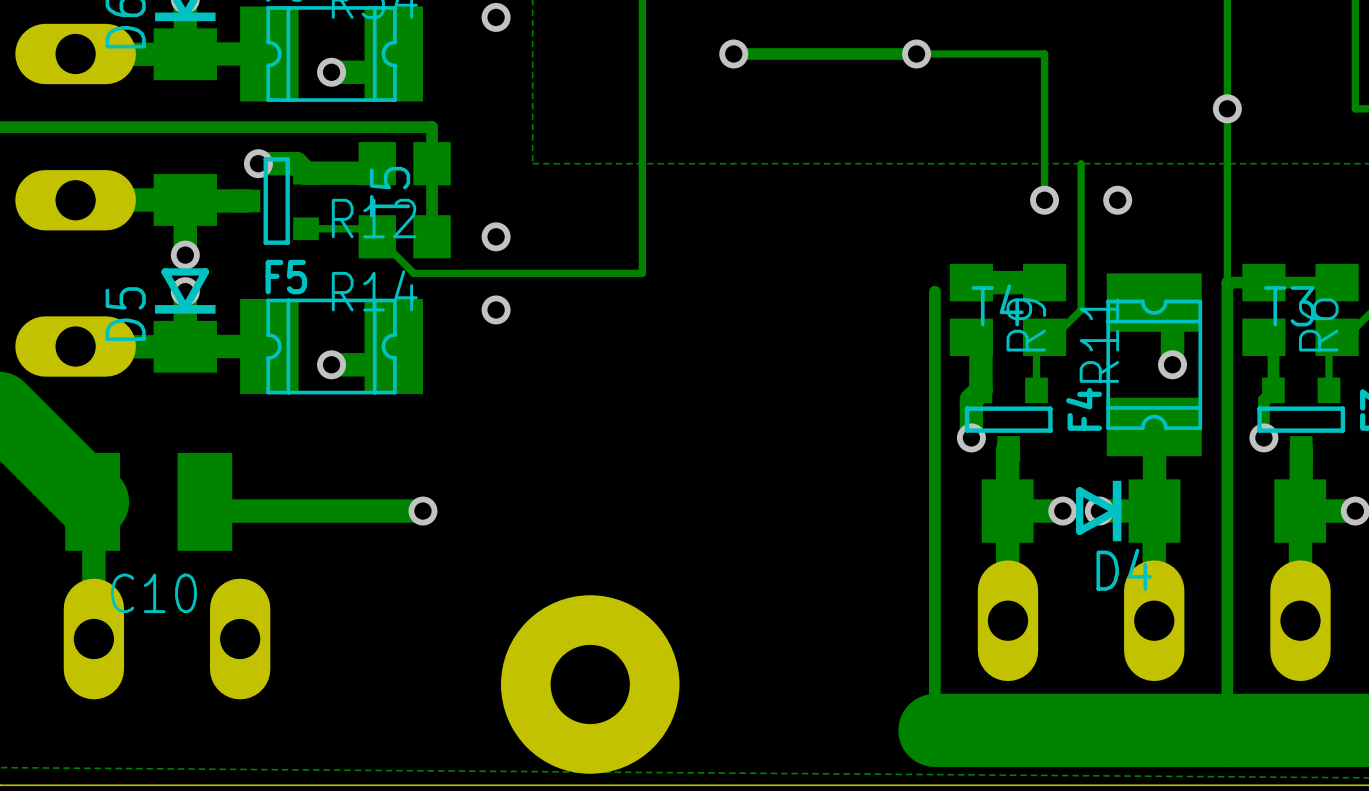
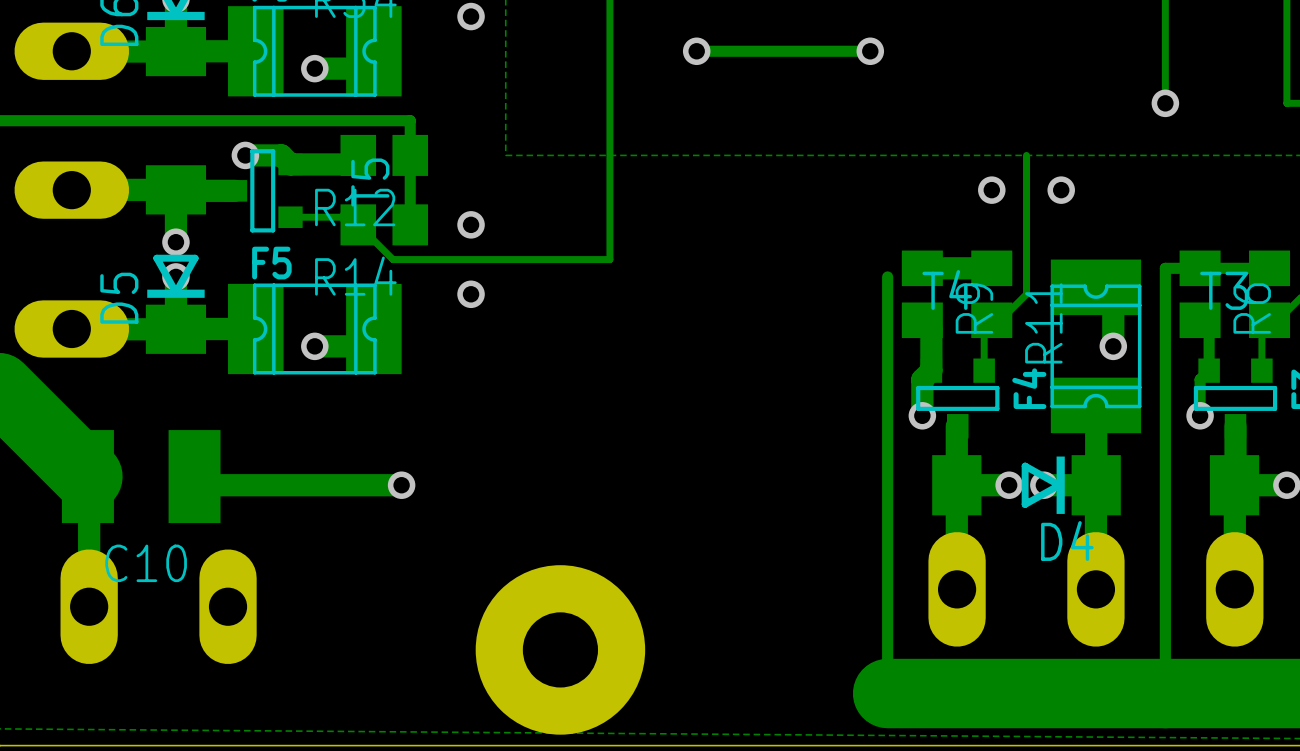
track: (916, 53) (1044, 53) (1044, 200) -> none
track: (1227, 108) (1227, 282) -> none

